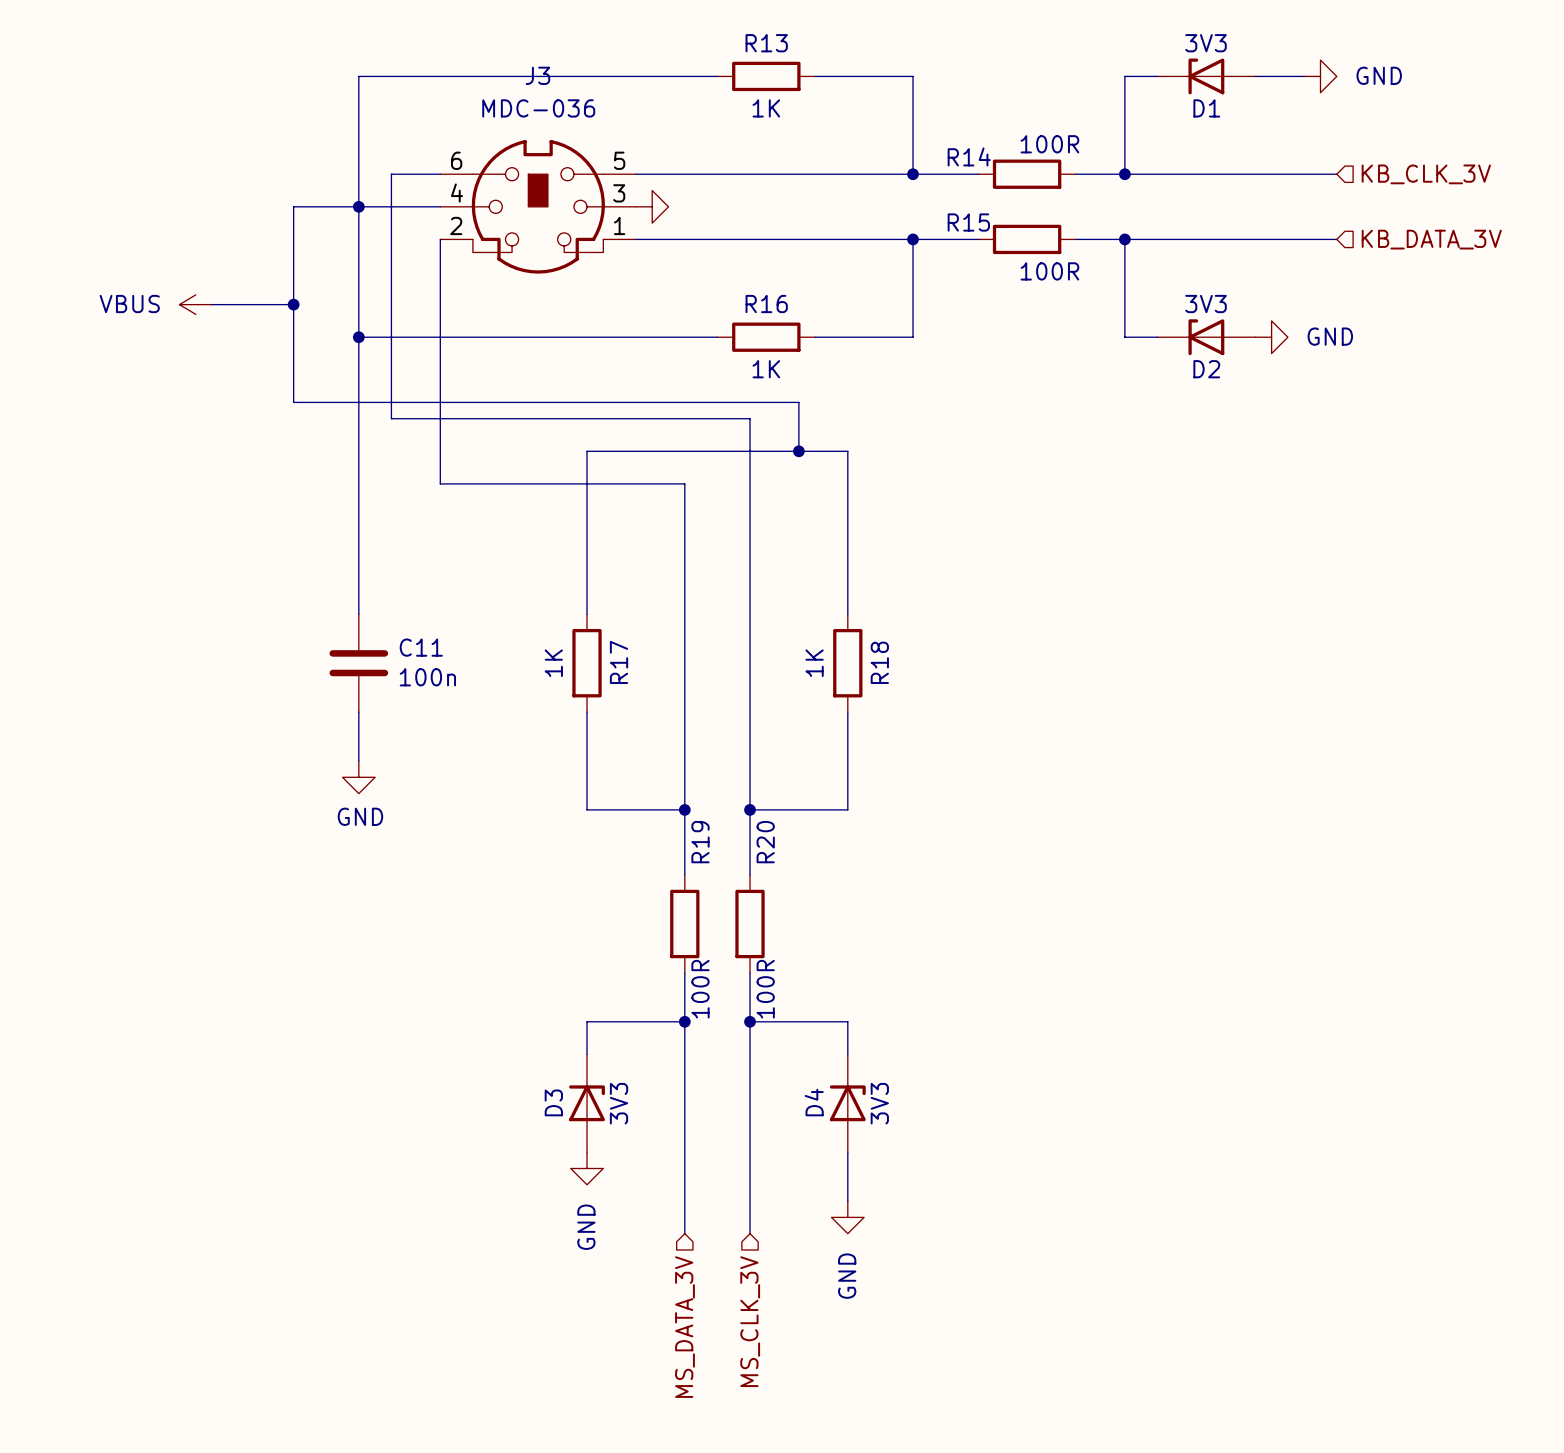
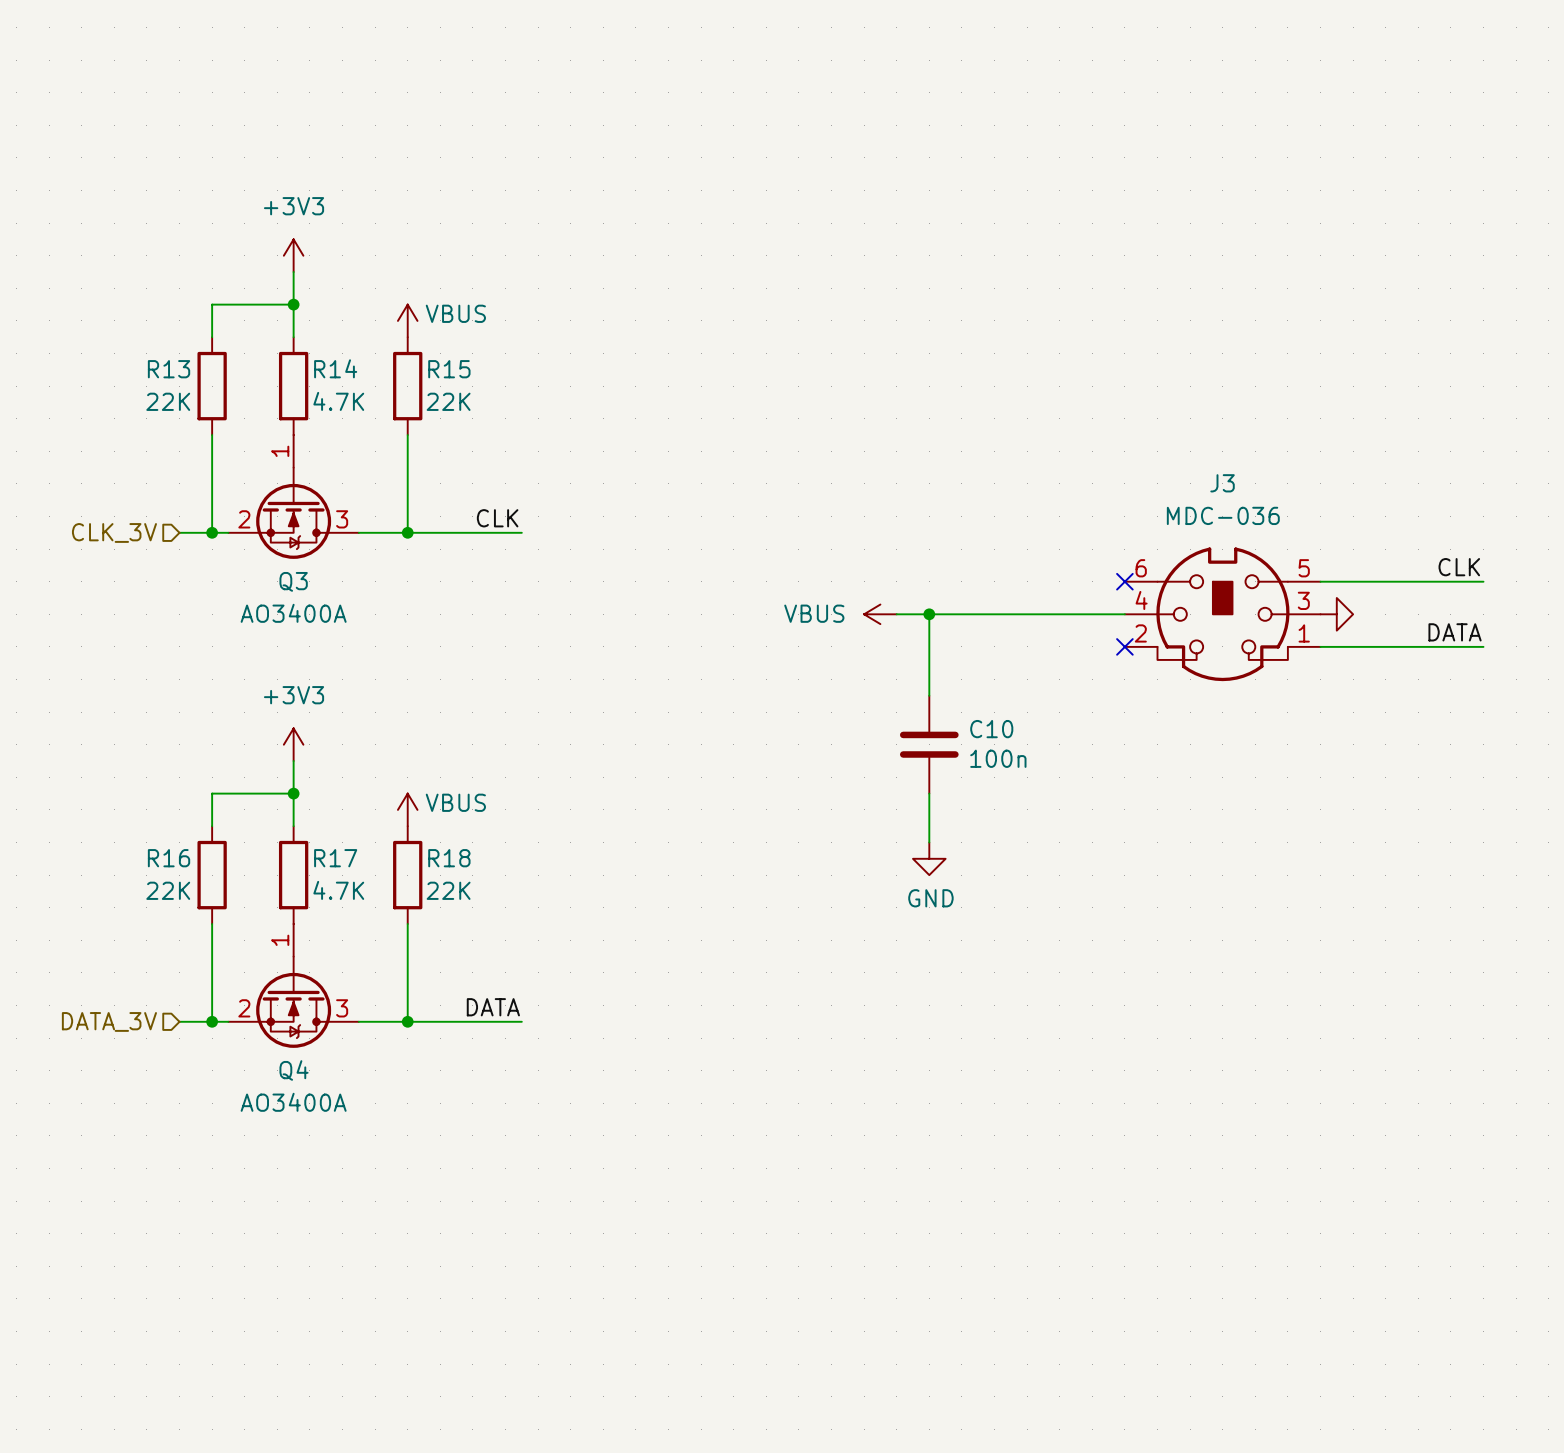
R13 name position: R13 (766, 43) -> R13 (169, 369)
wire: (717, 76) (358, 76) (358, 614) -> none
R13 rotation: 0° (766, 76) -> 90° clockwise (212, 386)
R13 position: (766, 76) -> (212, 386)
wire: (815, 76) (913, 76) (913, 174) -> none
wire: (1157, 76) (1124, 76) (1124, 174) -> none
D1: 3V3 (1206, 76) -> none
wire: (1255, 76) (1304, 76) -> none
power symbol: GND (1320, 76) -> none
R13 value: 1K (766, 108) -> 22K (168, 401)
R14 value: 100R (1049, 144) -> 4.7K (338, 401)
R14 name position: R14 (969, 156) -> R14 (335, 368)
wire: (440, 174) (391, 174) (391, 418) (750, 418) (750, 875) -> none
wire: (635, 174) (978, 174) -> none
junction: (913, 174) -> none
R14 rotation: 0° (1027, 174) -> 90° clockwise (293, 386)
R14 position: (1027, 174) -> (293, 386)
wire: (1076, 174) (1336, 174) -> none
junction: (1124, 174) -> none
hierarchical label: KB_CLK_3V (1426, 174) -> none
junction: (358, 206) -> none
wire: (440, 206) (293, 206) (293, 272) -> none
J3 position: (538, 206) -> (1222, 614)
power symbol: (652, 206) -> none
R15 name position: R15 (968, 222) -> R15 (449, 369)
wire: (440, 239) (440, 483) (684, 483) (684, 875) -> none
wire: (635, 239) (978, 239) -> none
wire: (913, 239) (913, 337) (815, 337) -> none
junction: (913, 239) -> none
R15 rotation: 0° (1027, 239) -> 90° clockwise (407, 386)
R15 position: (1027, 239) -> (407, 386)
wire: (1076, 239) (1336, 239) -> none
wire: (1124, 239) (1124, 337) (1157, 337) -> none
junction: (1124, 239) -> none
hierarchical label: KB_DATA_3V (1431, 239) -> none
power symbol: none -> +3V3 (293, 255)
R15 value: 100R (1049, 271) -> 22K (448, 401)
power symbol text position: VBUS (129, 304) -> VBUS (455, 313)
power symbol rotation: 0° (195, 304) -> 90° clockwise (407, 320)
power symbol position: VBUS (195, 304) -> VBUS (407, 320)
wire: none -> (212, 304) (212, 337)
R16 name position: R16 (766, 304) -> R16 (169, 858)
wire: (293, 337) (293, 402) (798, 402) (798, 451) -> none
wire: (358, 337) (717, 337) -> none
junction: (358, 337) -> none
R16 rotation: 0° (766, 337) -> 90° clockwise (212, 875)
R16 position: (766, 337) -> (212, 875)
D2: 3V3 (1206, 337) -> none
power symbol: GND (1271, 337) -> none
R16 value: 1K (766, 369) -> 22K (168, 890)
wire: none -> (212, 435) (212, 532)
wire: none -> (407, 435) (407, 532)
junction: (798, 451) -> none
Q3: none -> AO3400A (293, 496)
label: none -> CLK (497, 518)
hierarchical label: none -> CLK_3V (114, 532)
wire: none -> (179, 532) (228, 532)
junction: none -> (212, 532)
wire: none -> (358, 532) (521, 532)
junction: none -> (407, 532)
label: none -> CLK (1459, 567)
no-connect mark: none -> (1124, 581)
wire: none -> (1320, 581) (1483, 581)
wire: (587, 614) (587, 451) (847, 451) (847, 614) -> none
power symbol: none -> VBUS (880, 614)
wire: none -> (896, 614) (1124, 614)
wire: none -> (929, 614) (929, 695)
junction: none -> (929, 614)
power symbol: none -> (1336, 614)
label: none -> DATA (1455, 632)
no-connect mark: none -> (1124, 646)
wire: none -> (1320, 646) (1483, 646)
R17 name rotation: 0° (619, 662) -> 90° clockwise (335, 858)
R18 name rotation: 0° (879, 662) -> 90° clockwise (449, 858)
C11: 100n (358, 663) -> none
R17 value: 1K (553, 663) -> 4.7K (338, 890)
R17 position: (587, 663) -> (293, 875)
R18 value: 1K (814, 663) -> 22K (448, 890)
R18 position: (847, 663) -> (407, 875)
wire: (358, 712) (358, 761) -> none
wire: (587, 712) (587, 809) (684, 809) -> none
wire: (847, 712) (847, 809) (750, 809) -> none
power symbol: none -> +3V3 (293, 744)
C10: none -> 100n (929, 744)
wire: none -> (293, 761) (293, 826)
power symbol: GND (358, 777) -> none
wire: none -> (293, 793) (212, 793) (212, 826)
junction: none -> (293, 793)
wire: none -> (929, 793) (929, 842)
power symbol: none -> VBUS (407, 809)
junction: (684, 809) -> none
junction: (750, 809) -> none
power symbol: none -> GND (929, 858)
wire: none -> (212, 924) (212, 1021)
wire: none -> (407, 924) (407, 1021)
R19: 100R (684, 924) -> none
R20: 100R (750, 924) -> none
wire: (684, 972) (684, 1233) -> none
wire: (750, 972) (750, 1233) -> none
Q4: none -> AO3400A (293, 985)
label: none -> DATA (493, 1007)
hierarchical label: none -> DATA_3V (109, 1021)
wire: none -> (179, 1021) (228, 1021)
junction: none -> (212, 1021)
wire: none -> (358, 1021) (521, 1021)
junction: none -> (407, 1021)
wire: (684, 1021) (587, 1021) (587, 1054) -> none
junction: (684, 1021) -> none
wire: (750, 1021) (847, 1021) (847, 1054) -> none
junction: (750, 1021) -> none
D3: 3V3 (587, 1103) -> none
D4: 3V3 (847, 1103) -> none
wire: (847, 1152) (847, 1201) -> none
power symbol: GND (587, 1168) -> none
power symbol: GND (847, 1217) -> none
hierarchical label: MS_CLK_3V (750, 1321) -> none
hierarchical label: MS_DATA_3V (684, 1327) -> none

